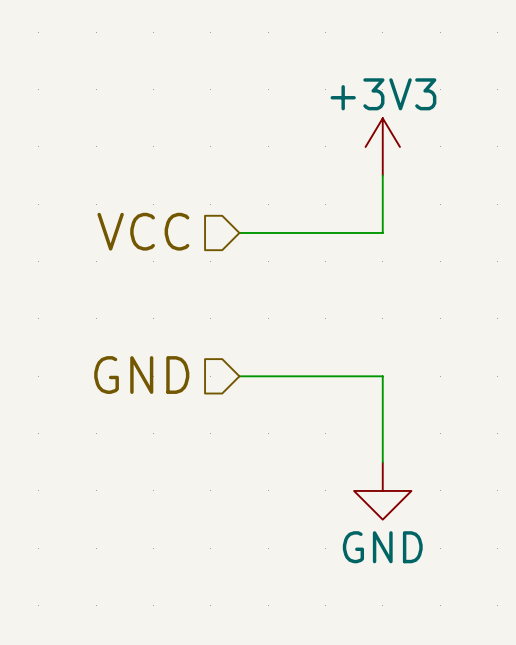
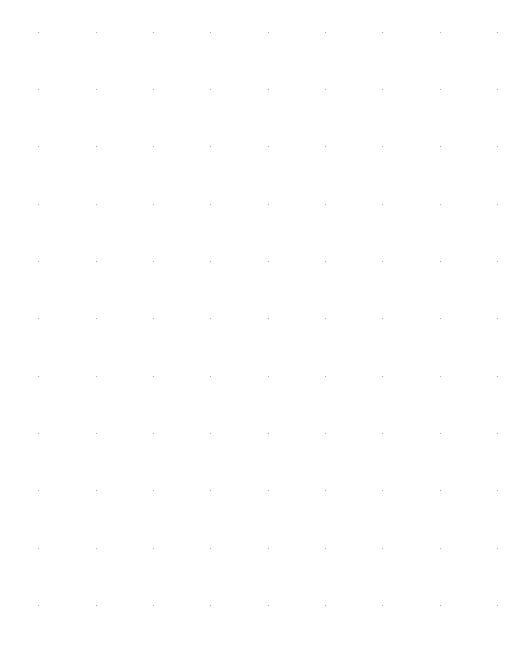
power symbol: +3V3 (382, 146) -> none
wire: (382, 175) (382, 232) (239, 232) -> none
hierarchical label: VCC (143, 231) -> none
hierarchical label: GND (141, 375) -> none
wire: (239, 376) (382, 376) (382, 462) -> none
power symbol: GND (382, 490) -> none

